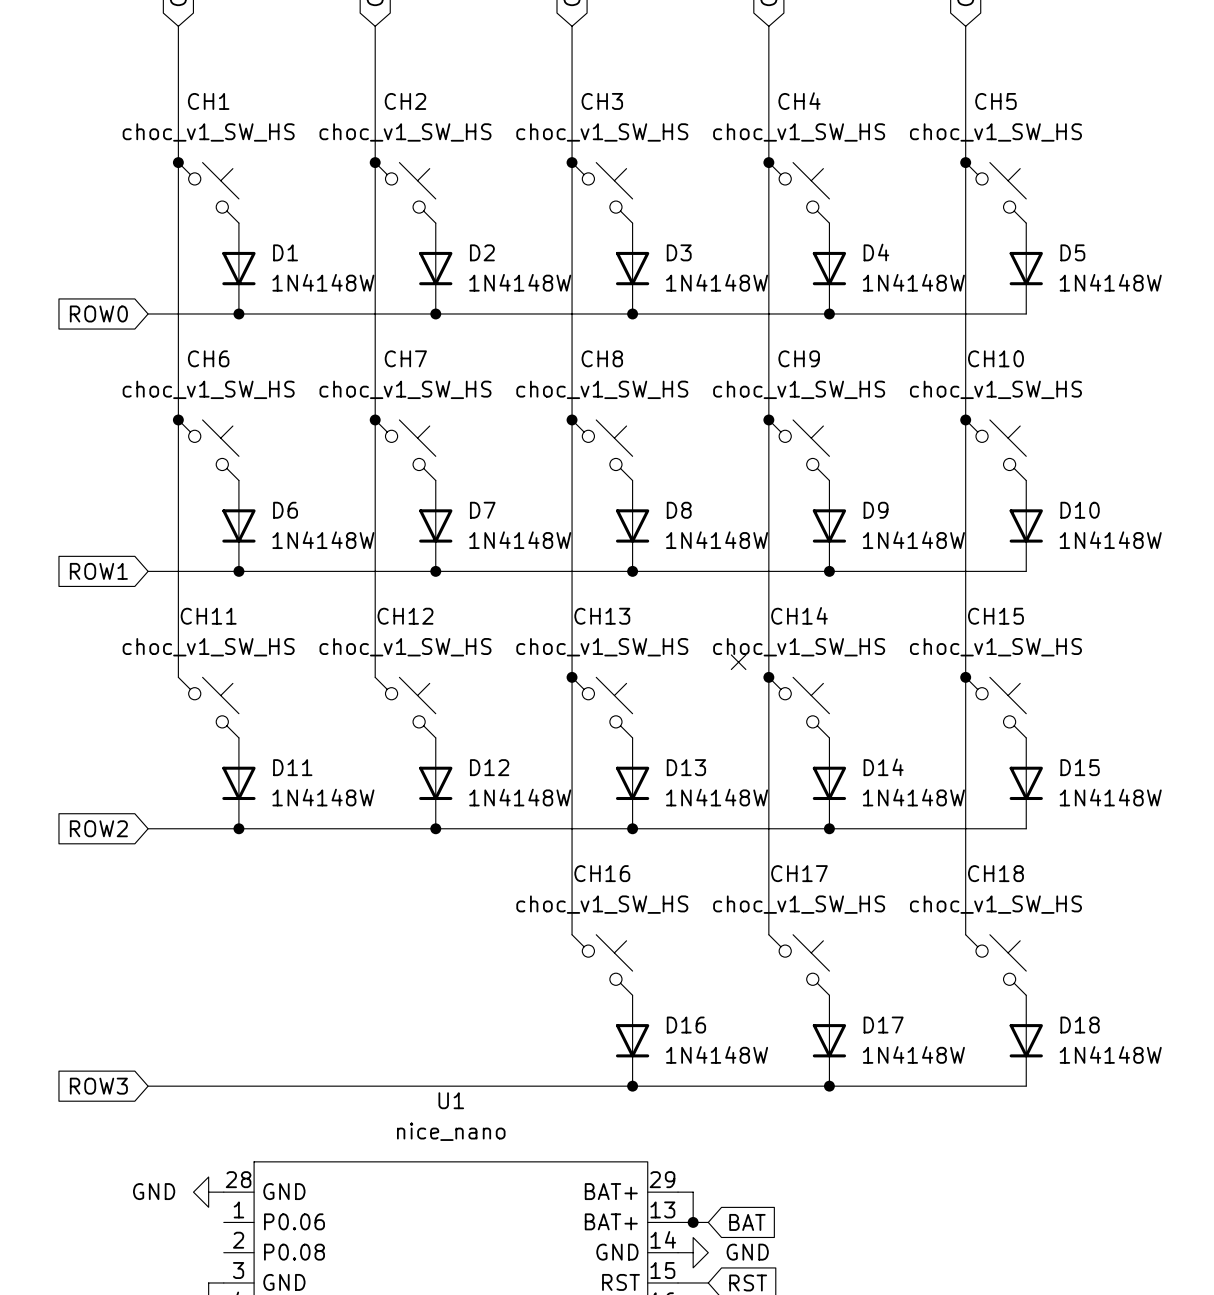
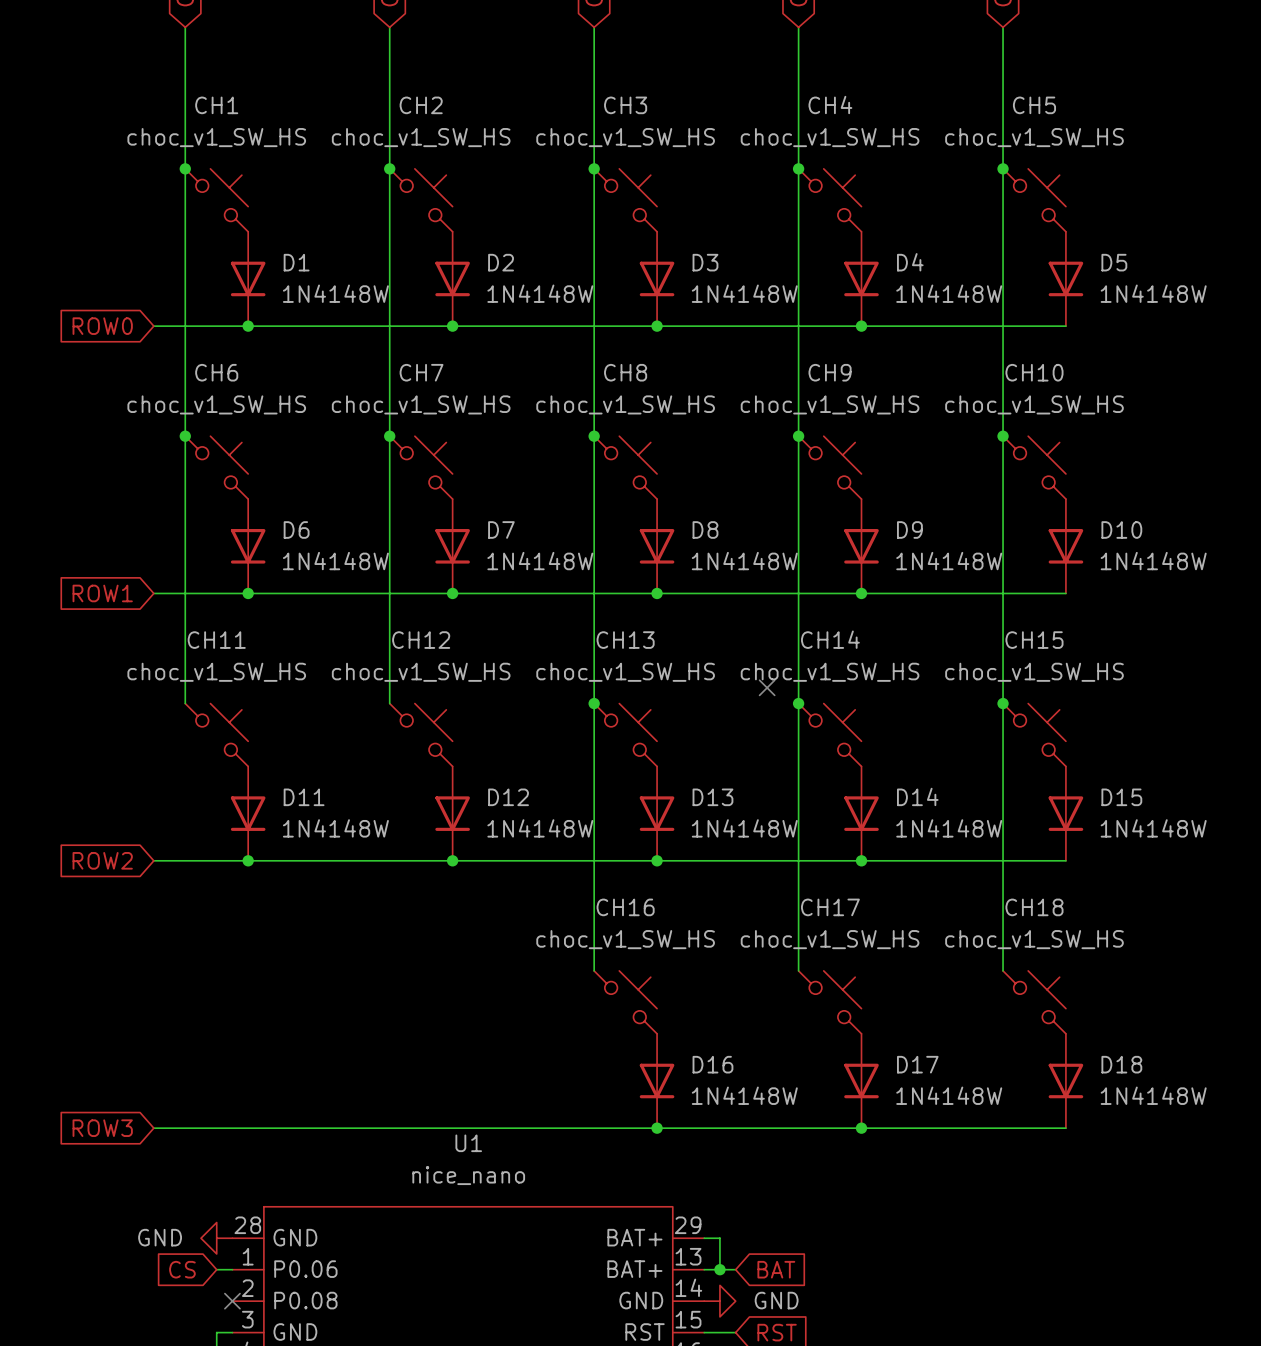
global label: none -> CS (182, 1269)
wire: none -> (216, 1269) (232, 1269)
no-connect mark: none -> (232, 1301)

